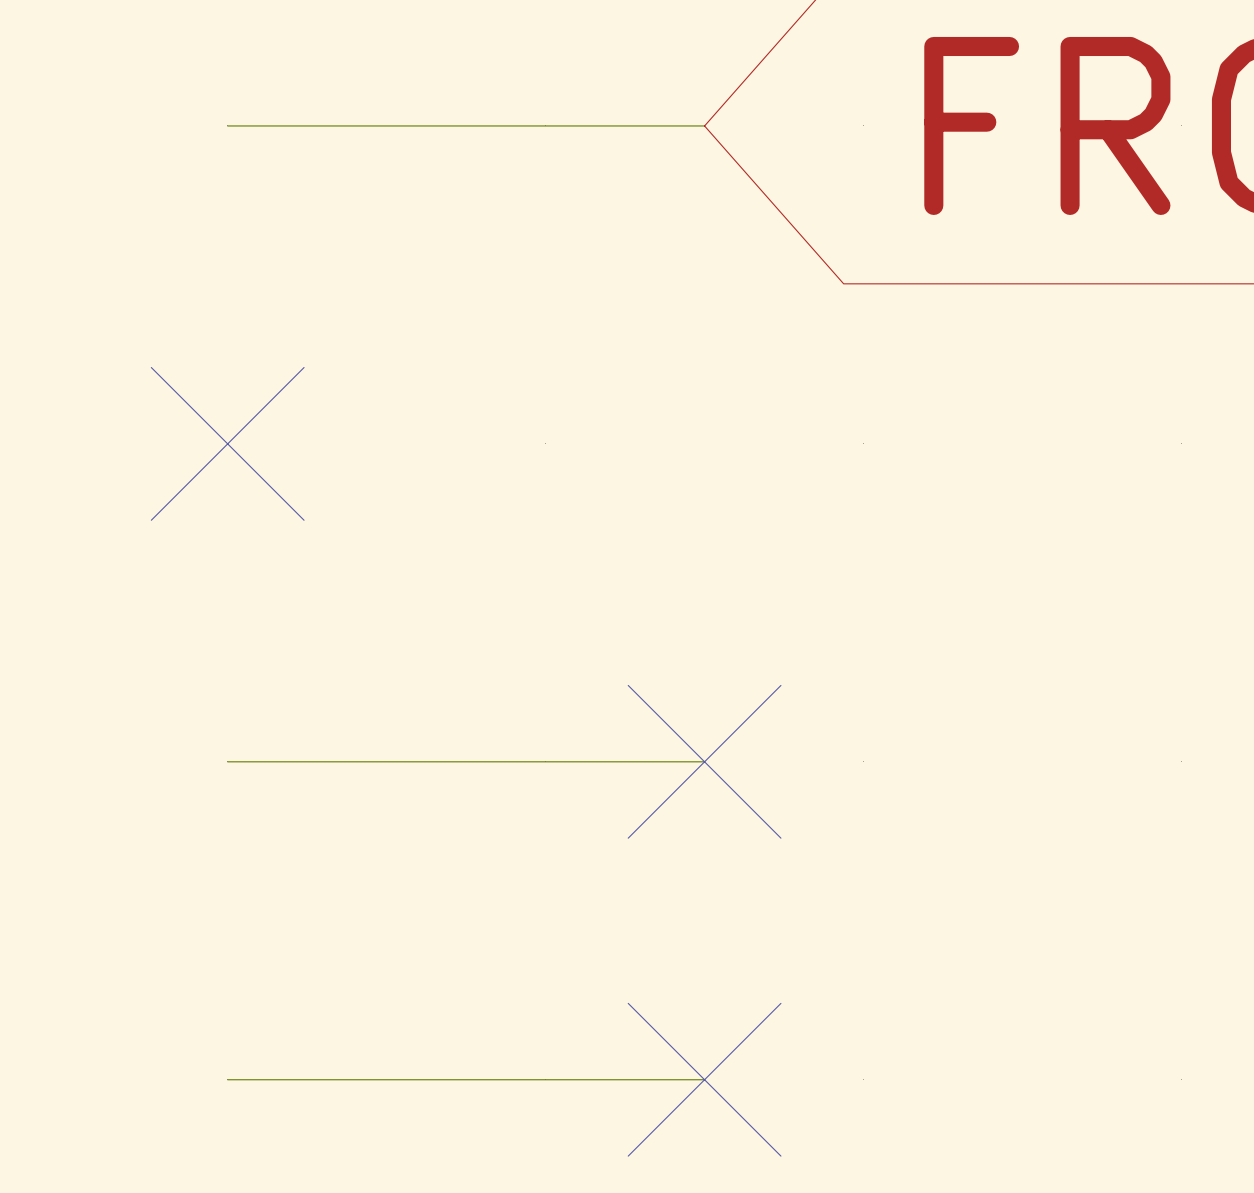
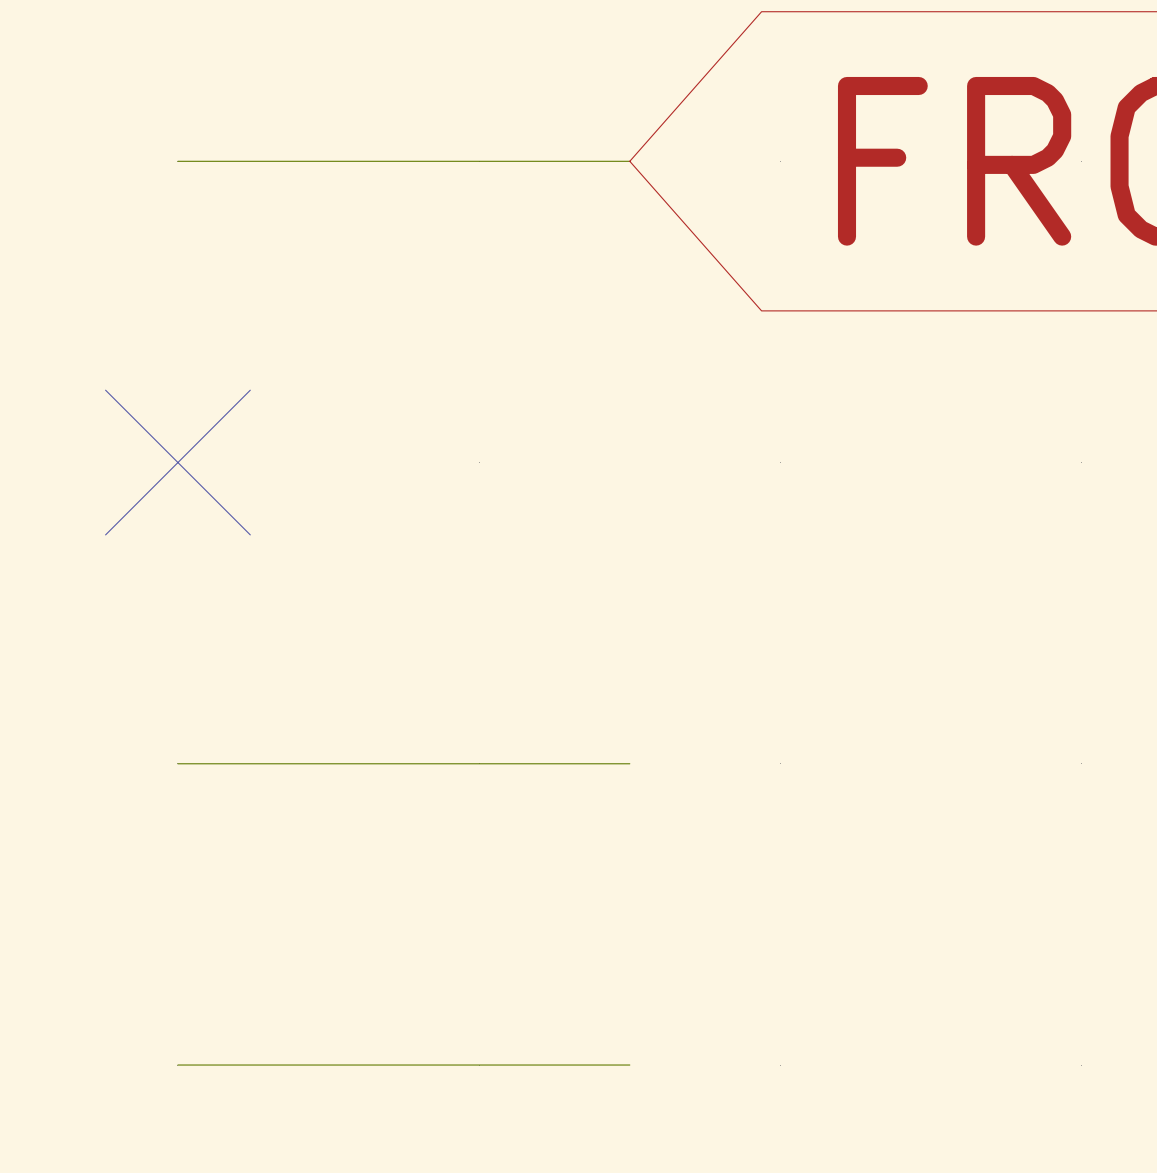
no-connect mark: (704, 761) -> none
no-connect mark: (704, 1079) -> none

